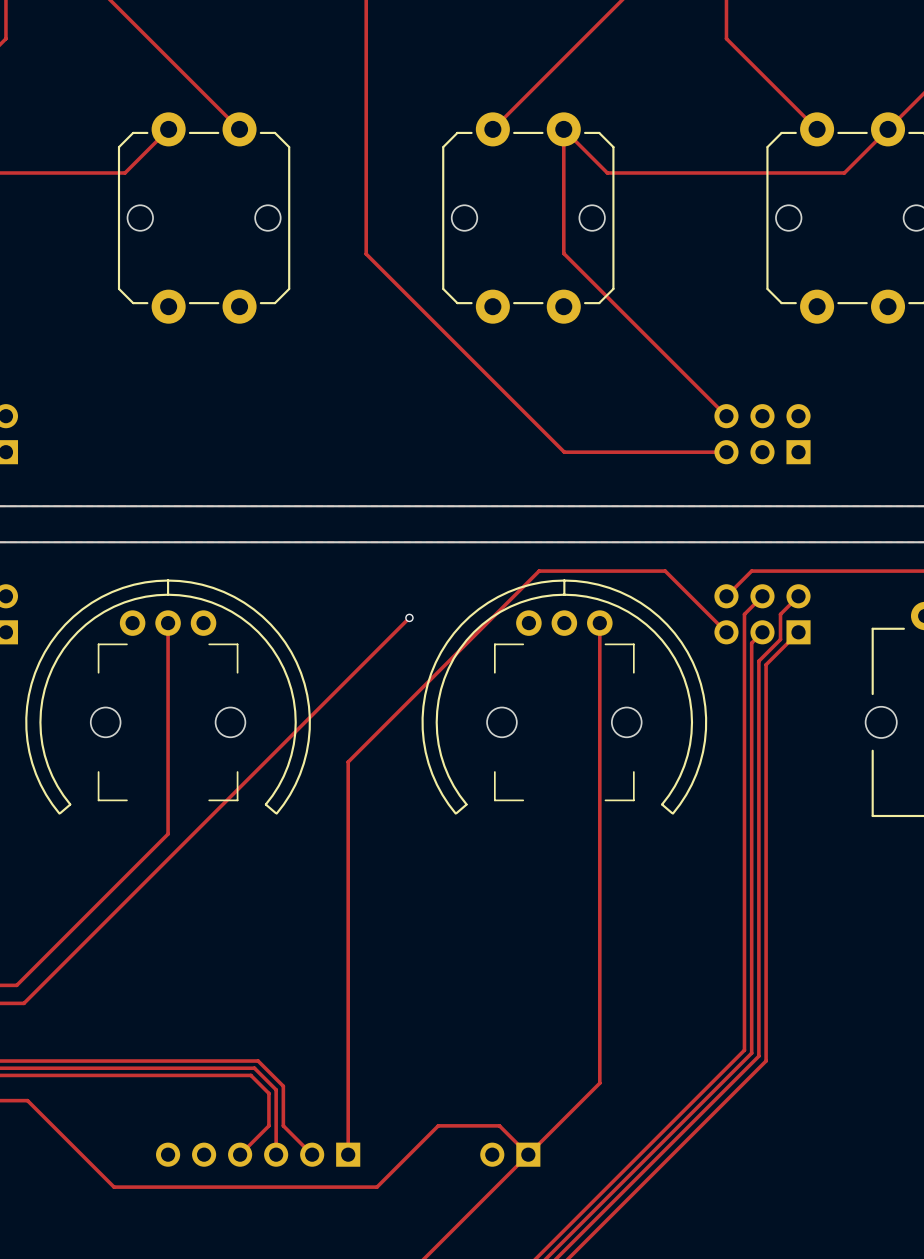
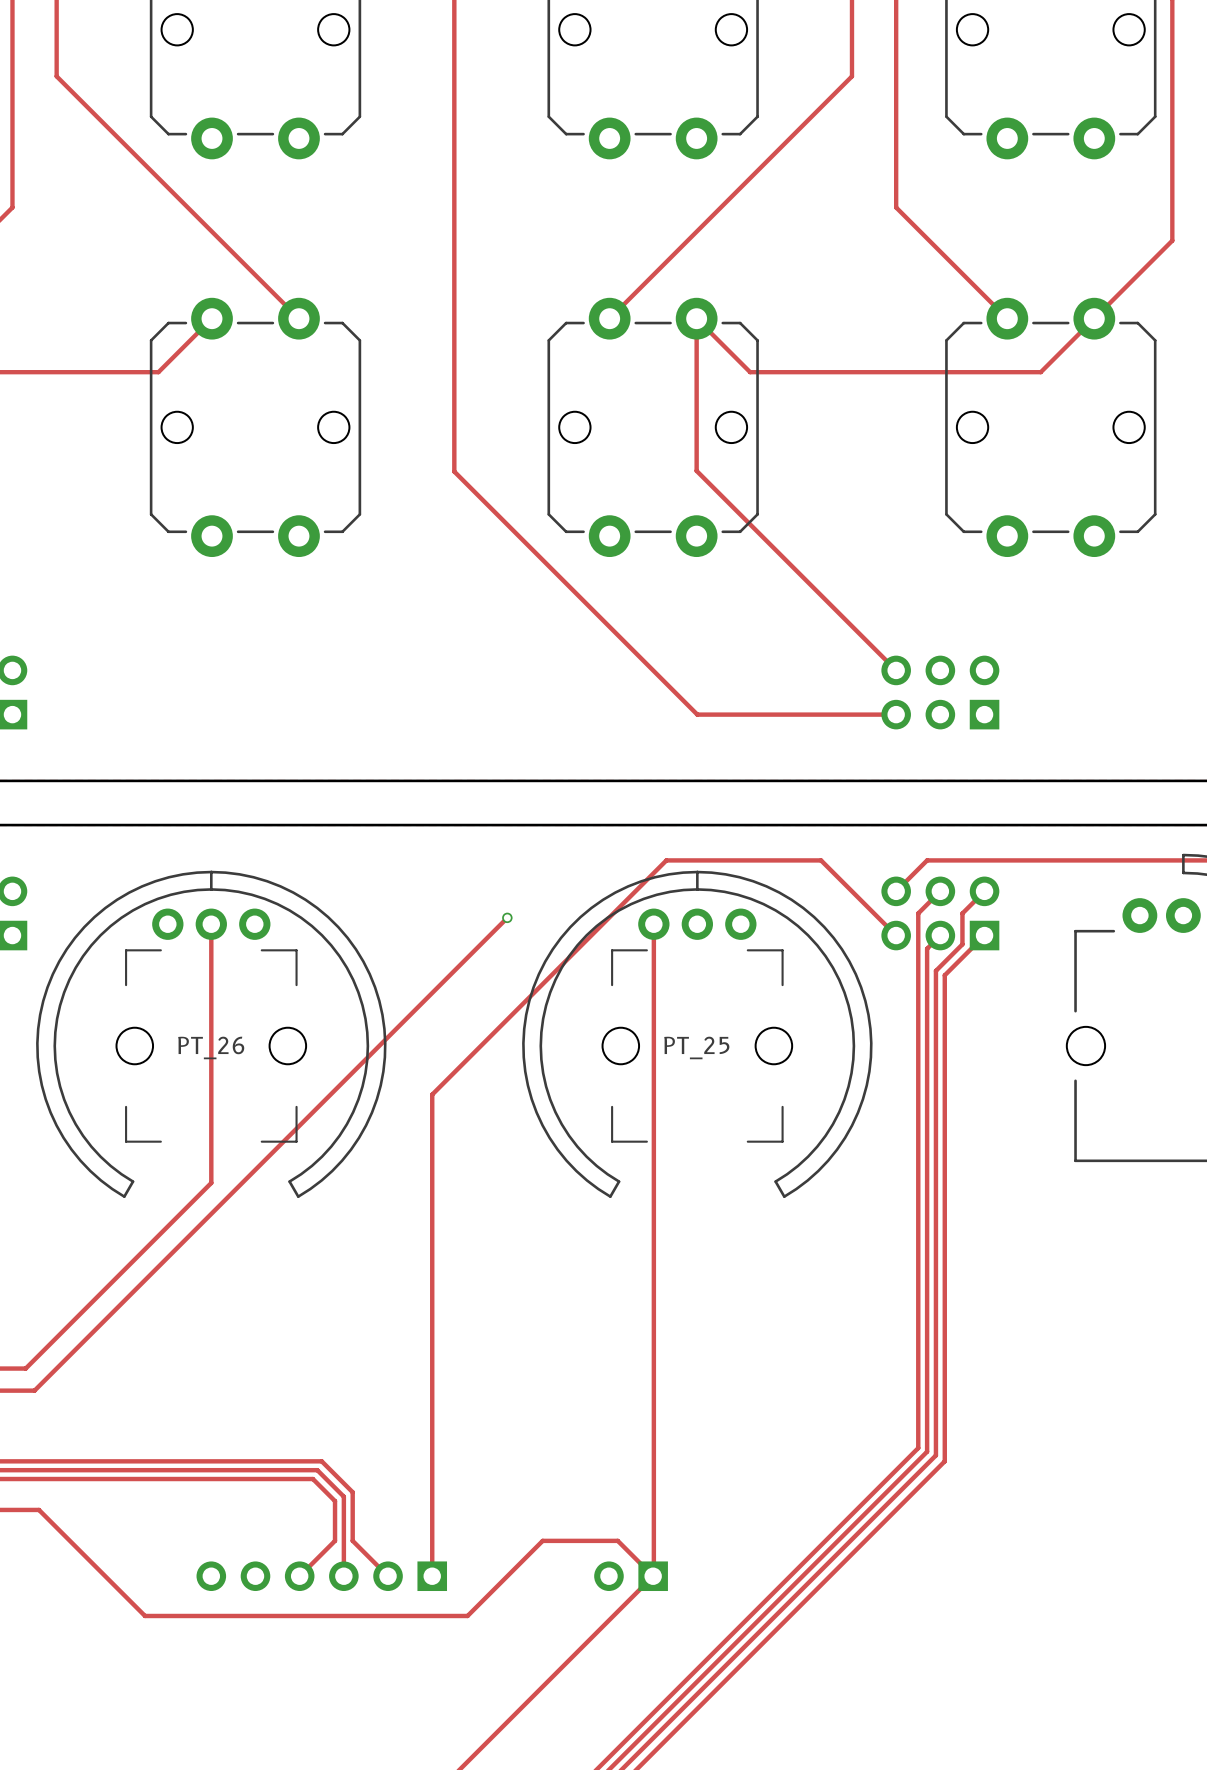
track: (599, 623) (599, 1083) (528, 1154) -> (653, 924) (653, 1575)
part: (168, 697) -> none
part: (564, 697) -> none
PT_26: none -> (211, 1034)
PT_25: none -> (697, 1034)

